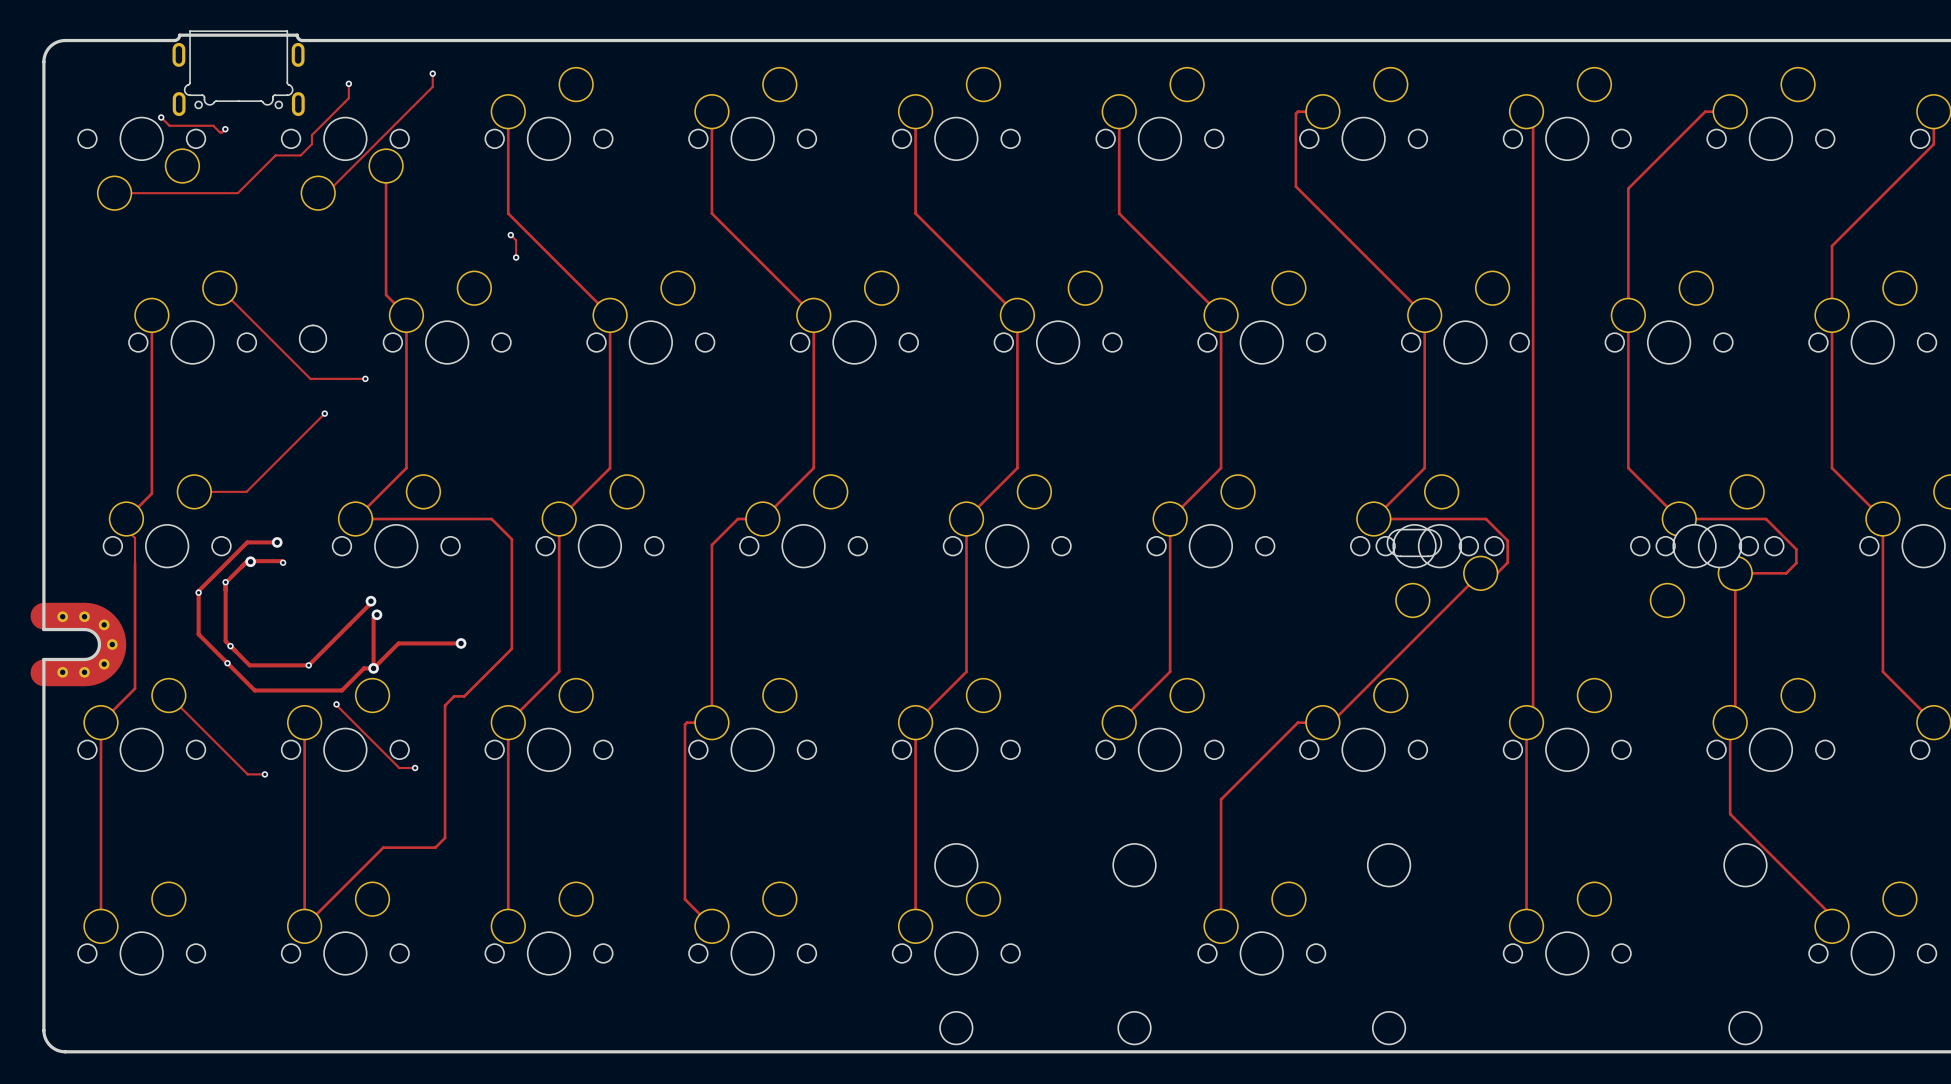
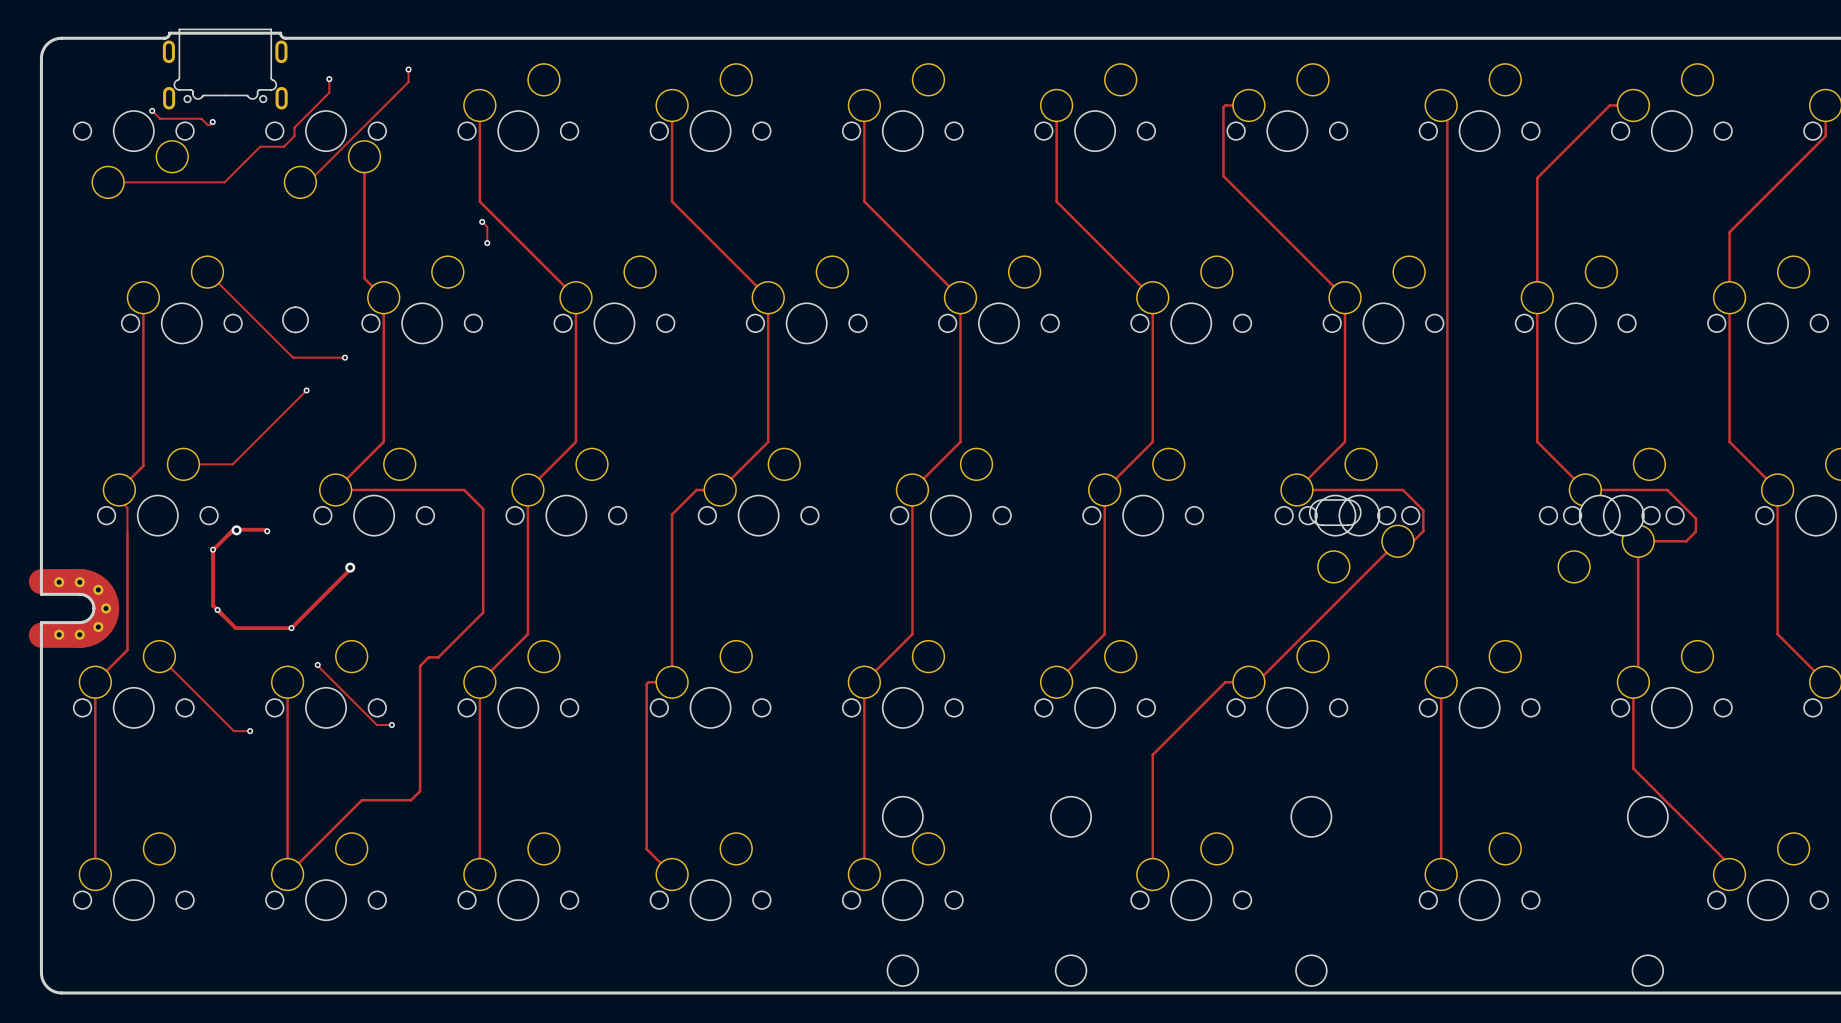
track: (277, 542) (247, 542) (198, 591) (198, 634) (254, 690) (341, 690) (363, 668) (373, 668) -> none
via: (277, 542) -> none
via: (198, 592) -> none
track: (376, 614) (373, 618) (373, 668) -> none
via: (376, 614) -> none
track: (461, 643) (398, 643) (373, 668) -> none
via: (461, 643) -> none
via: (227, 663) -> none
via: (373, 668) -> none

